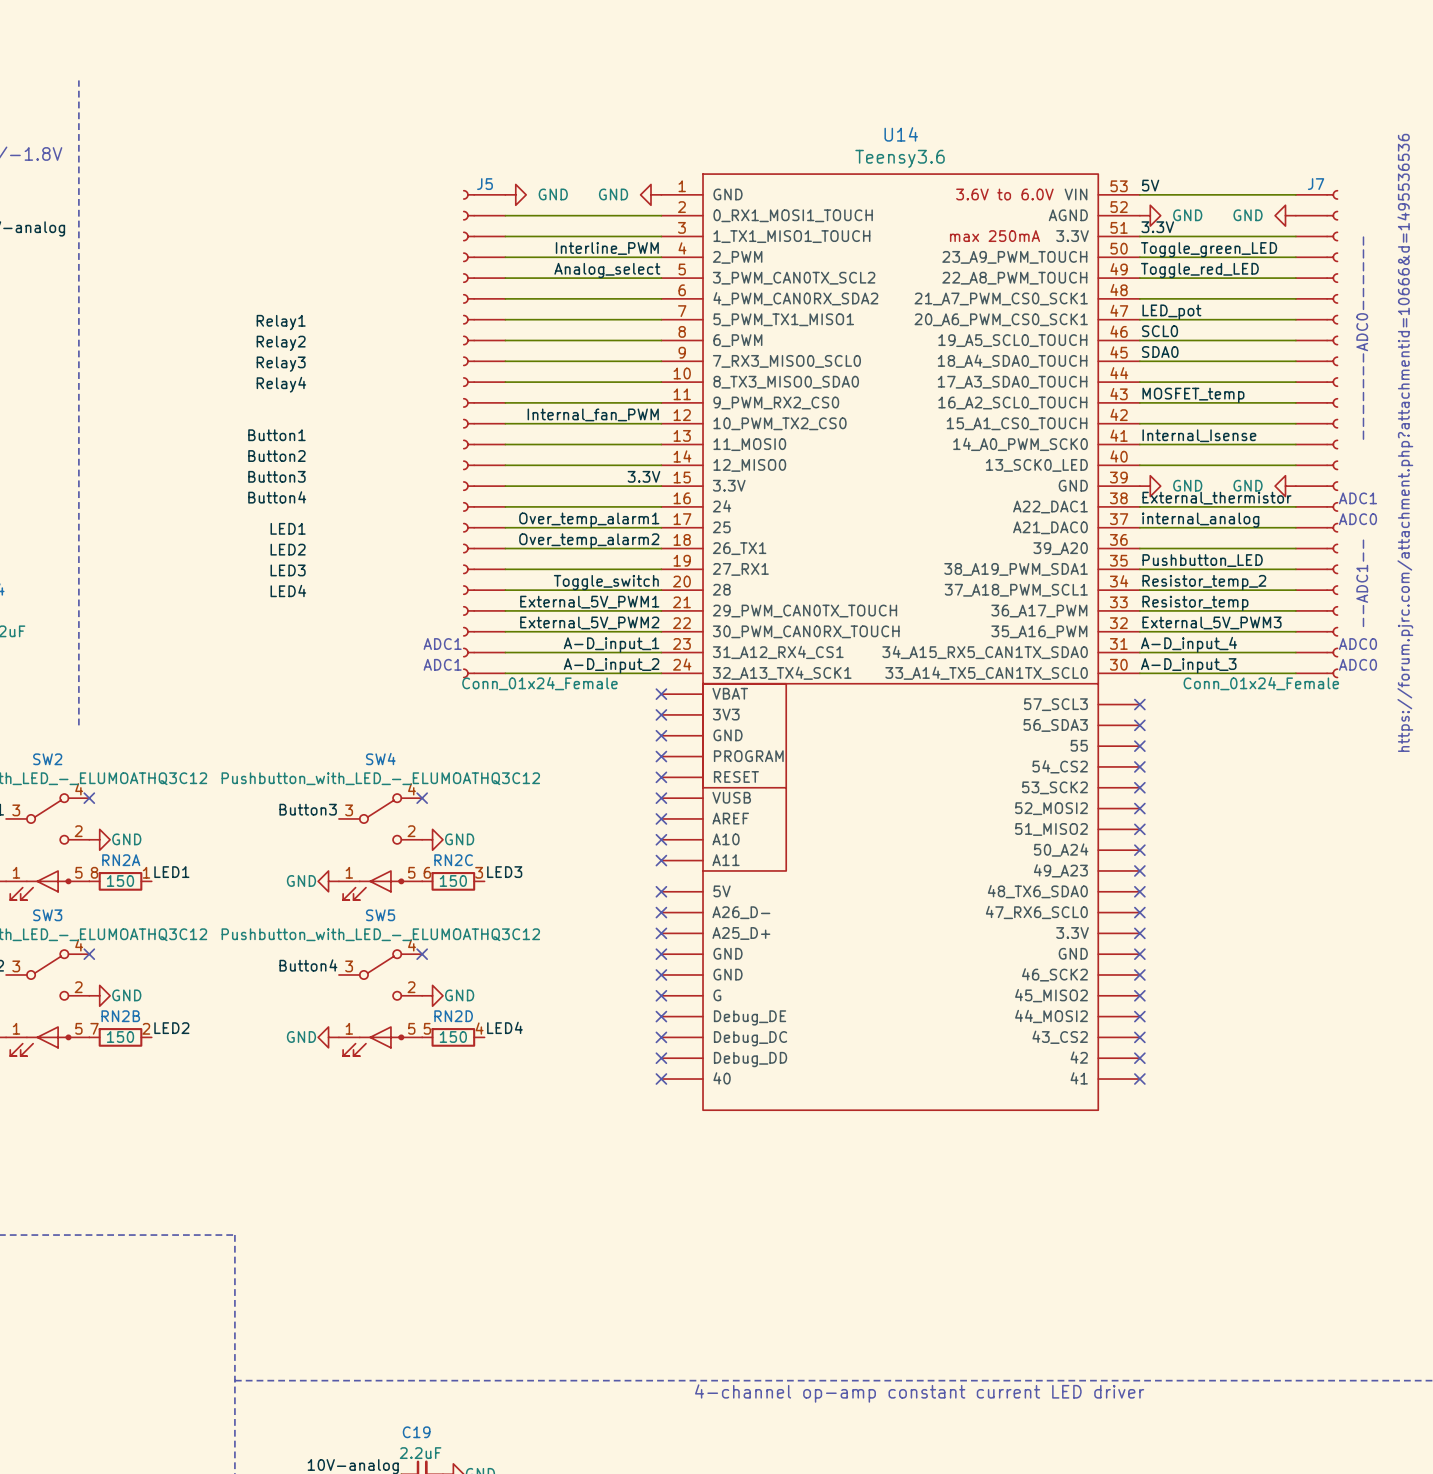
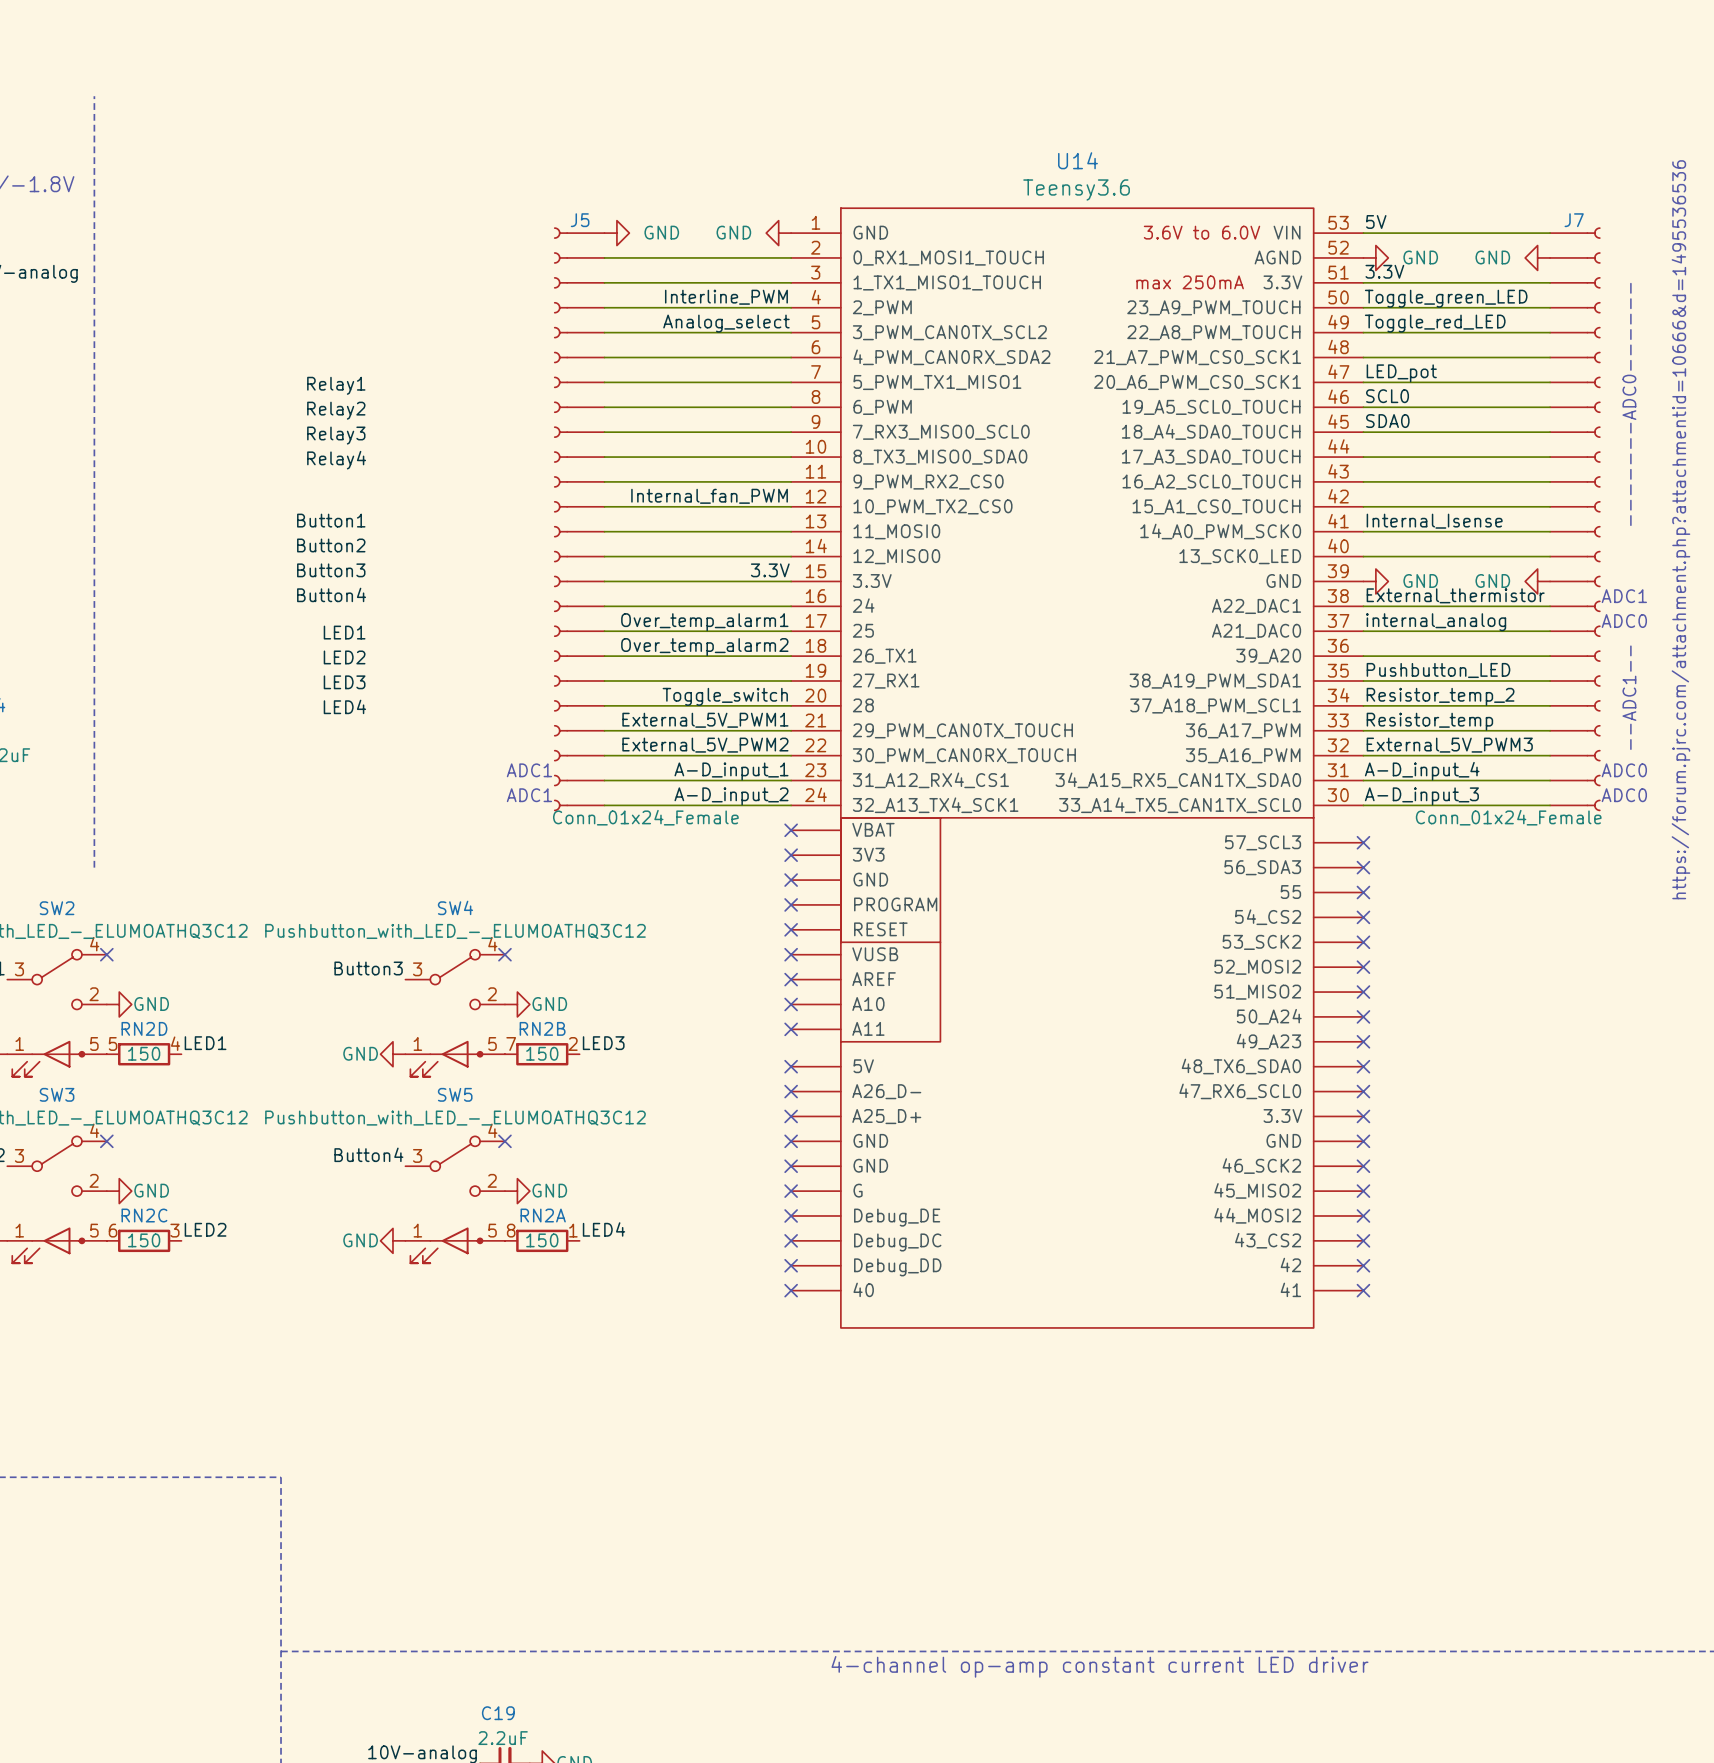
label: MOSFET_temp (1193, 395) -> none
RN2A position: (120, 881) -> (542, 1240)
RN2C position: (453, 881) -> (144, 1240)
RN2B position: (120, 1037) -> (542, 1054)
RN2D position: (453, 1037) -> (144, 1054)

